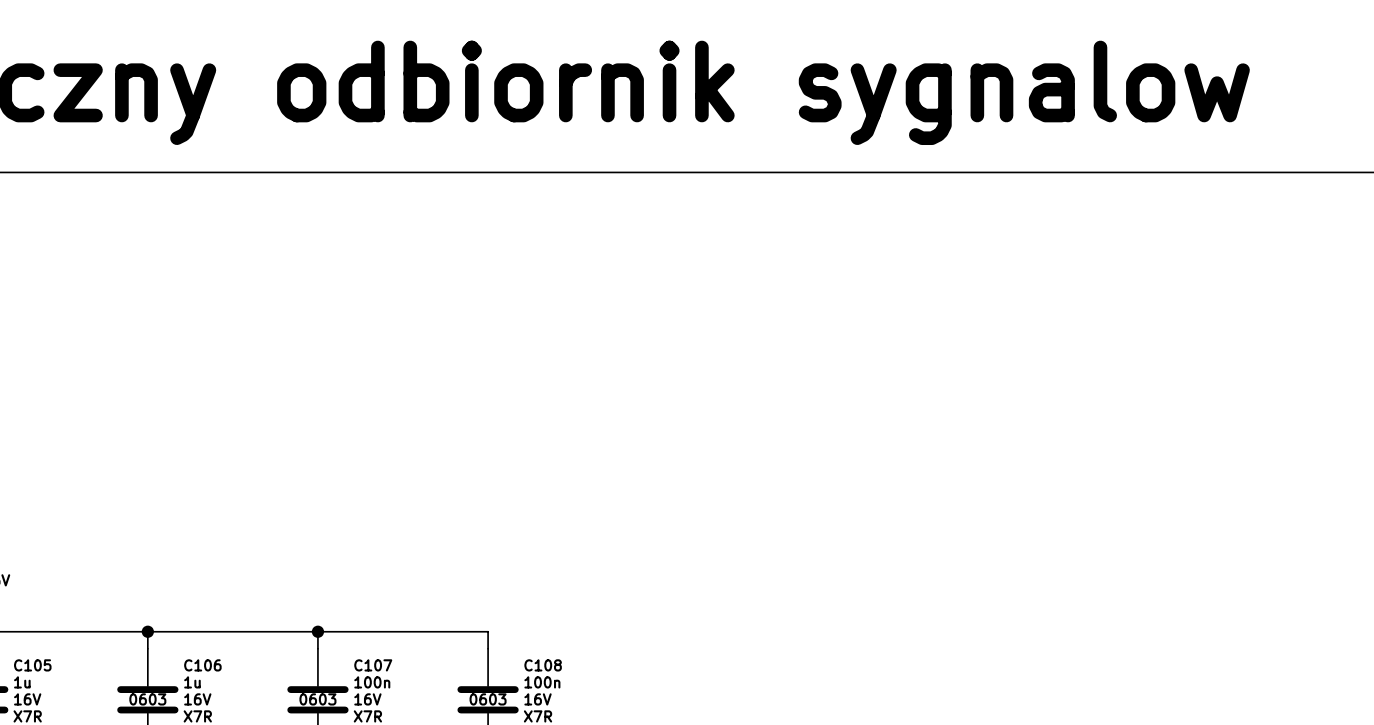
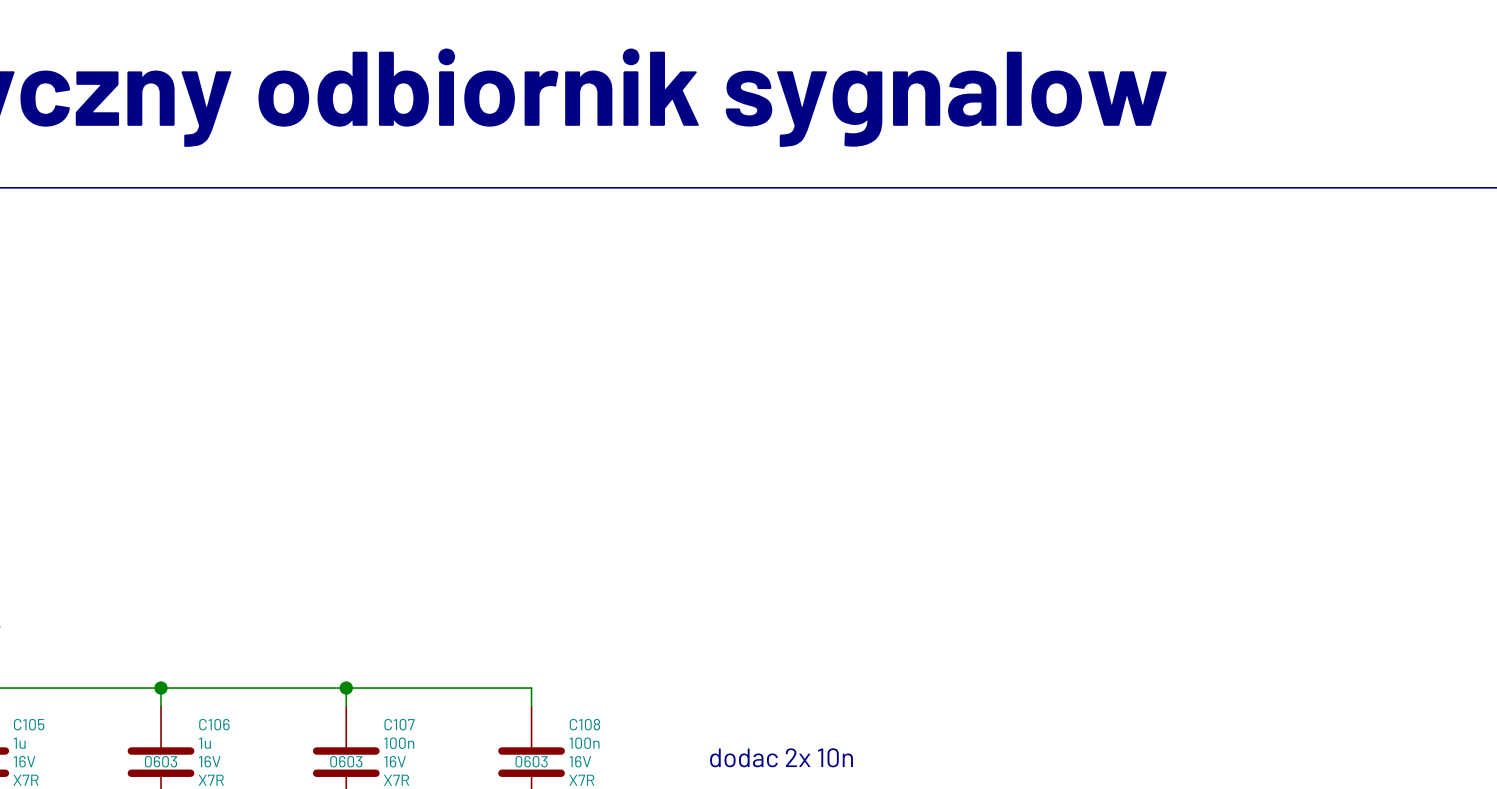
text: none -> dodac 2x 10n (781, 757)

